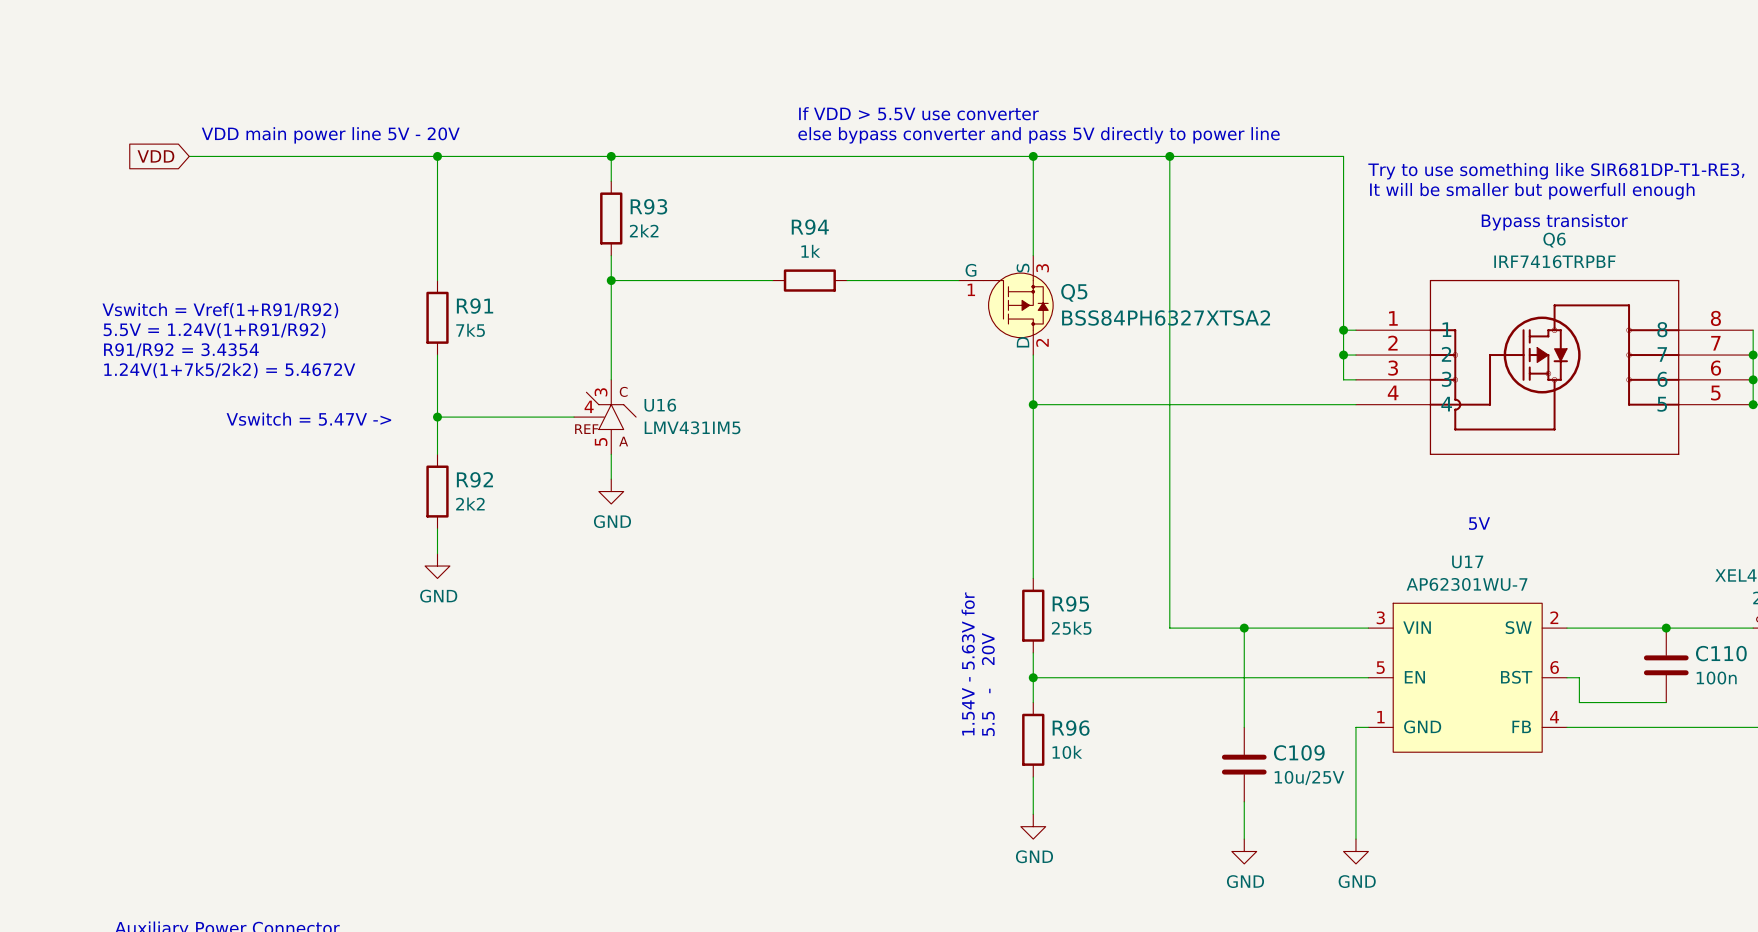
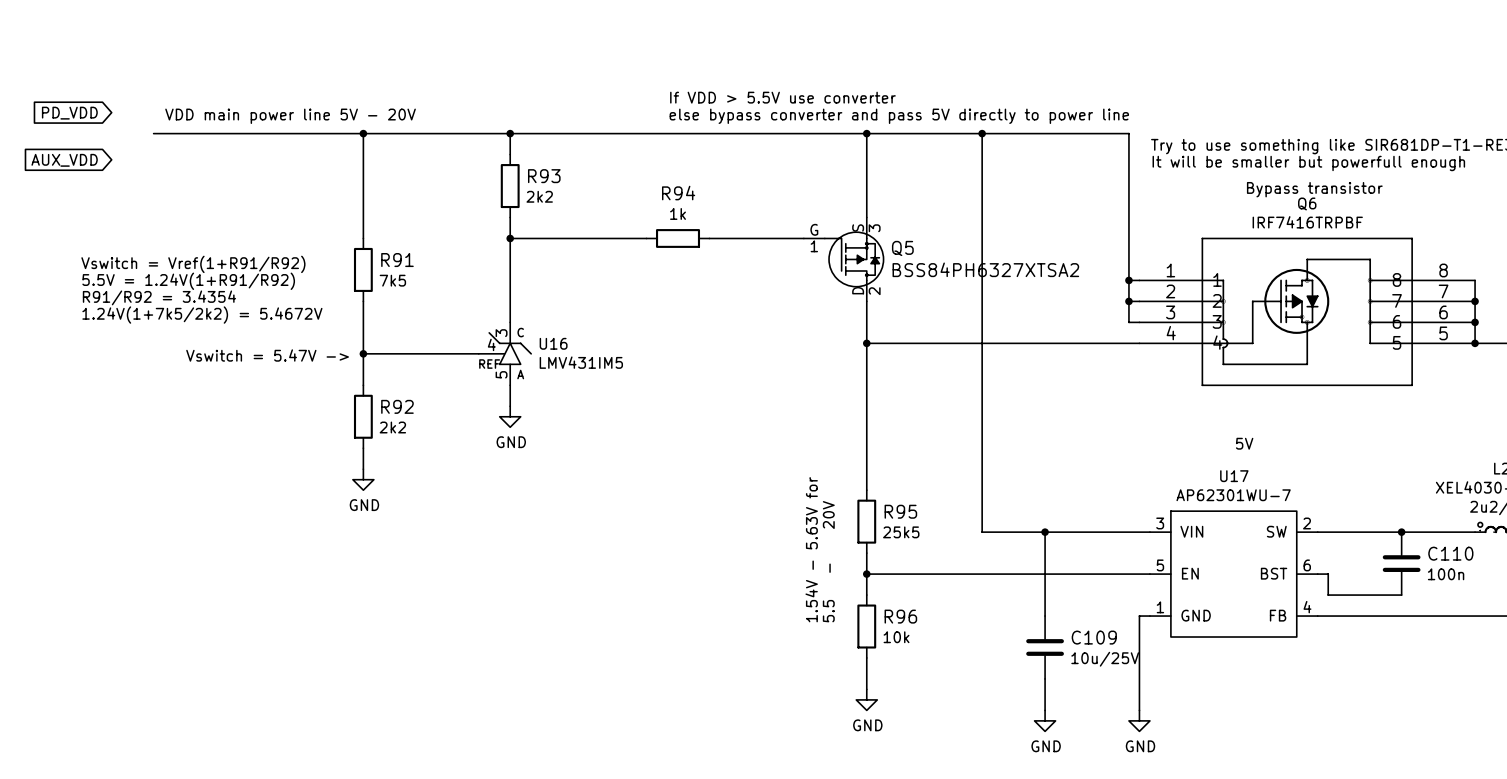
global label: VDD (155, 156) -> PD_VDD (69, 113)
global label: none -> AUX_VDD (64, 160)

